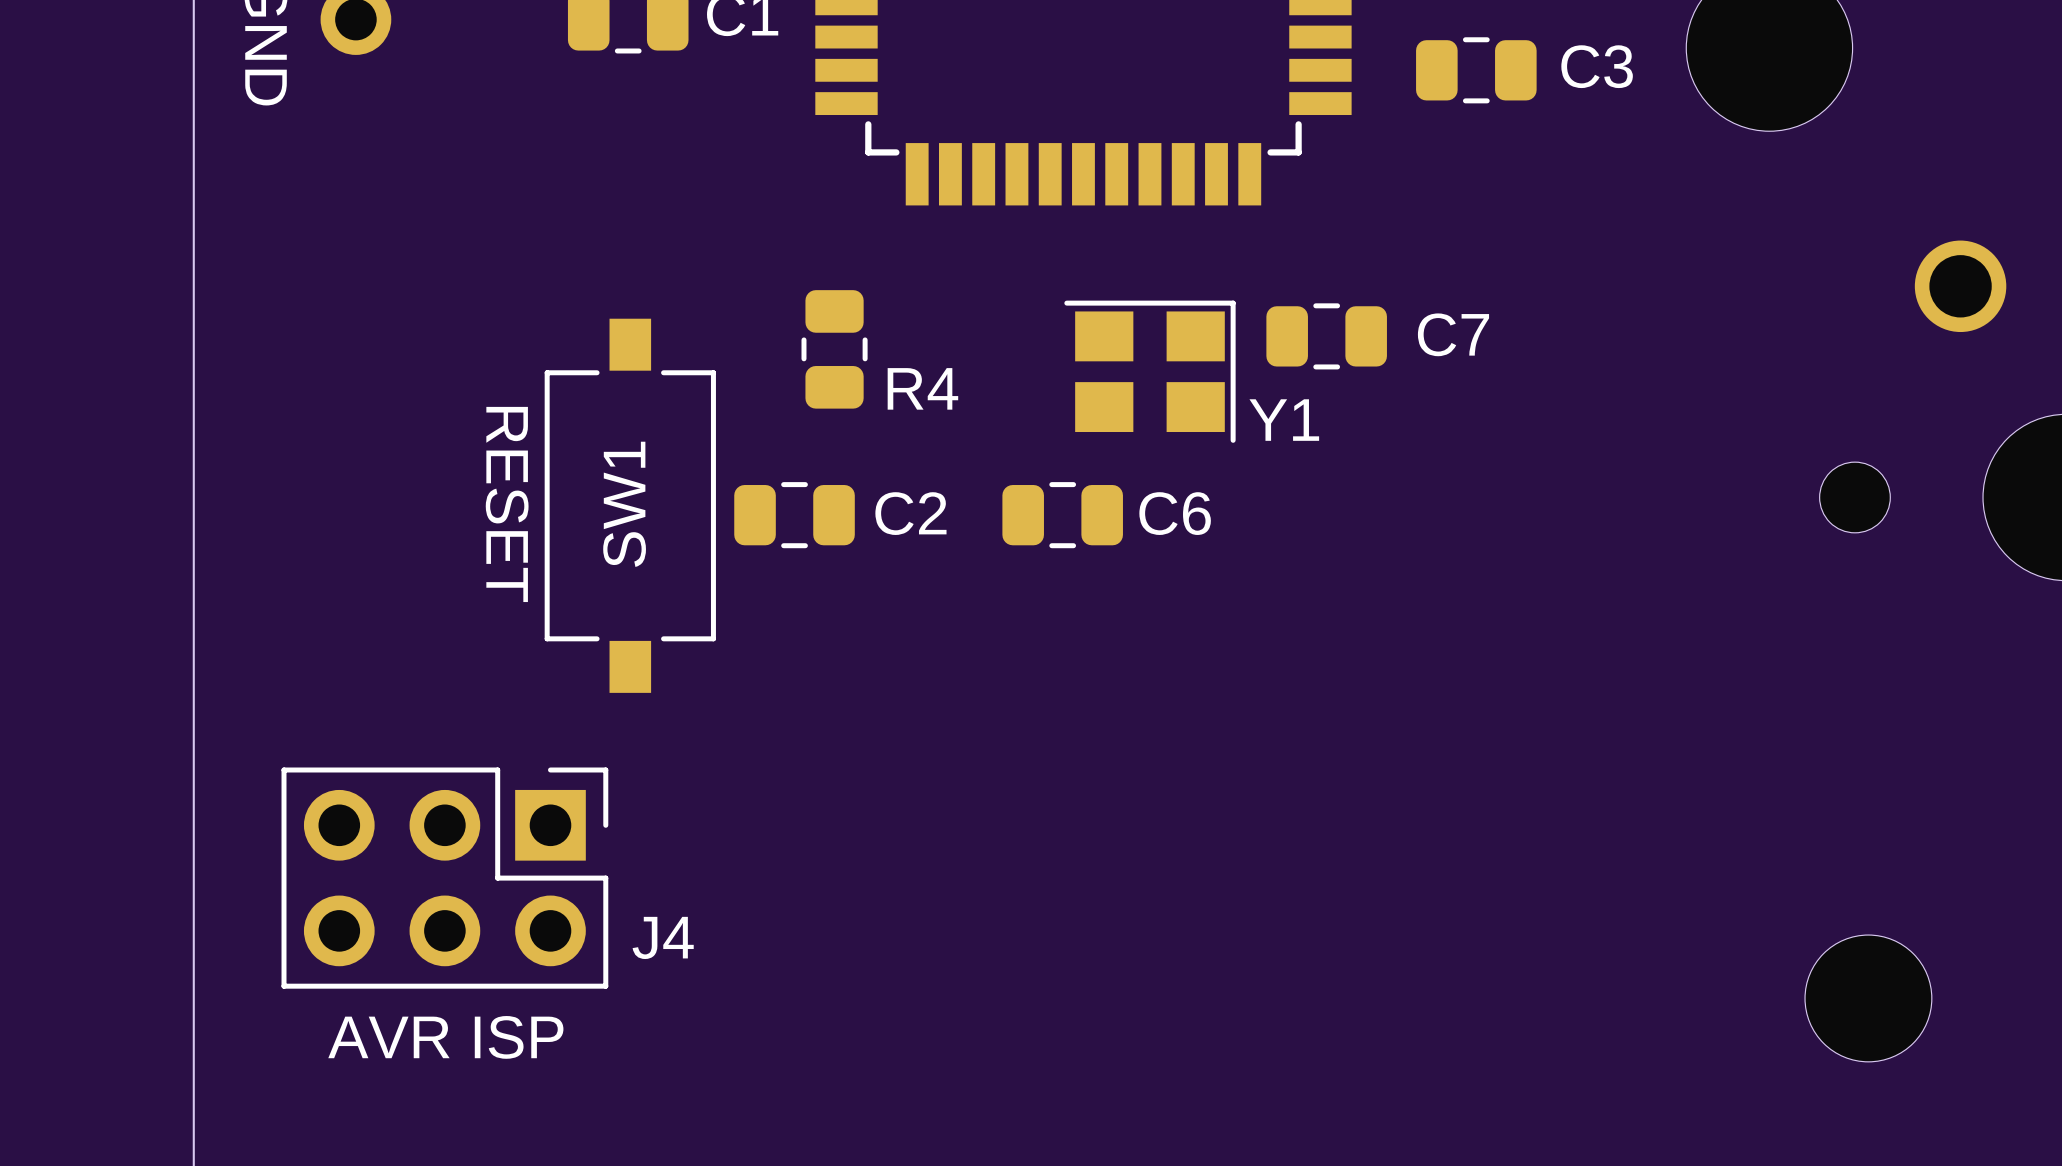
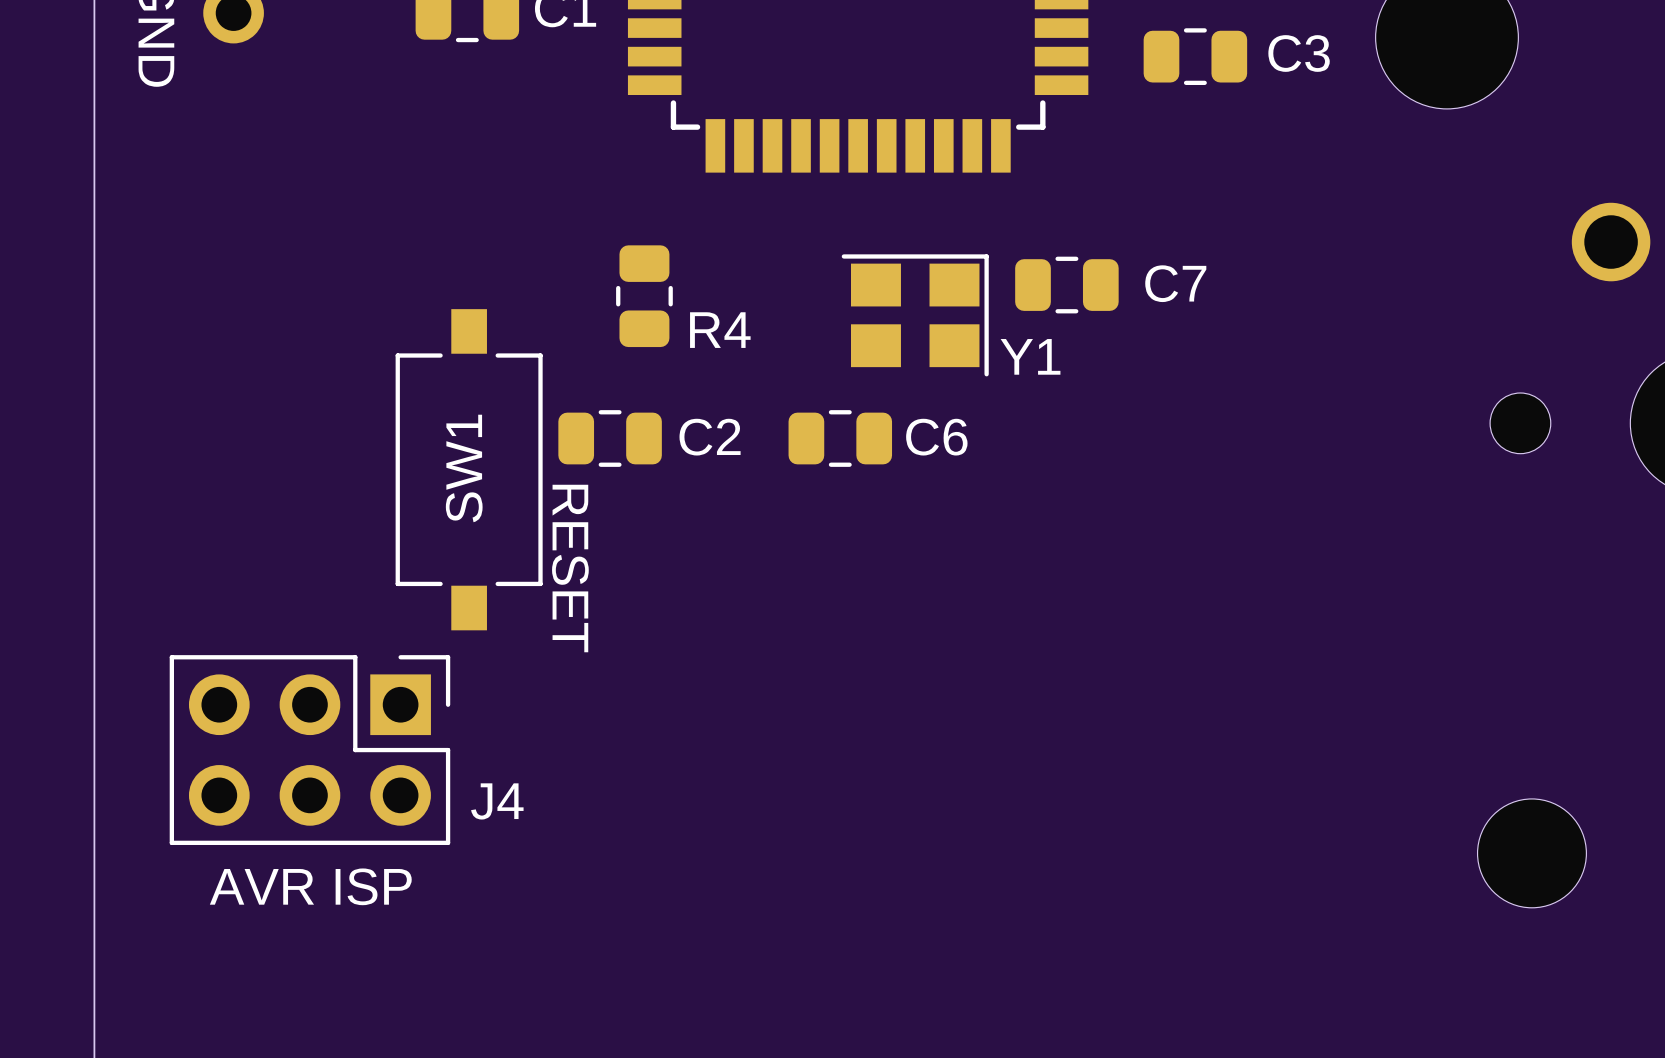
text position: RESET (507, 504) -> RESET (570, 568)
SW1 position: (630, 505) -> (469, 469)

